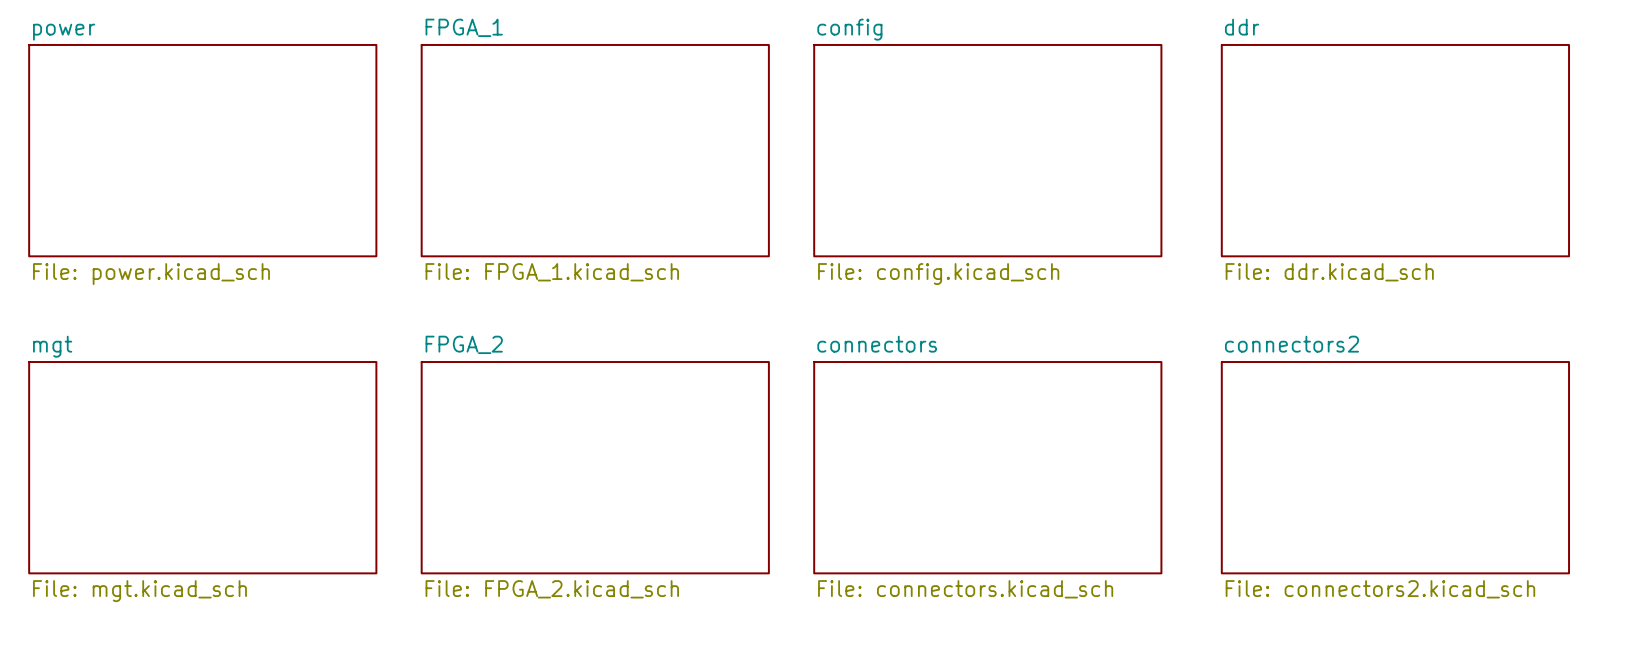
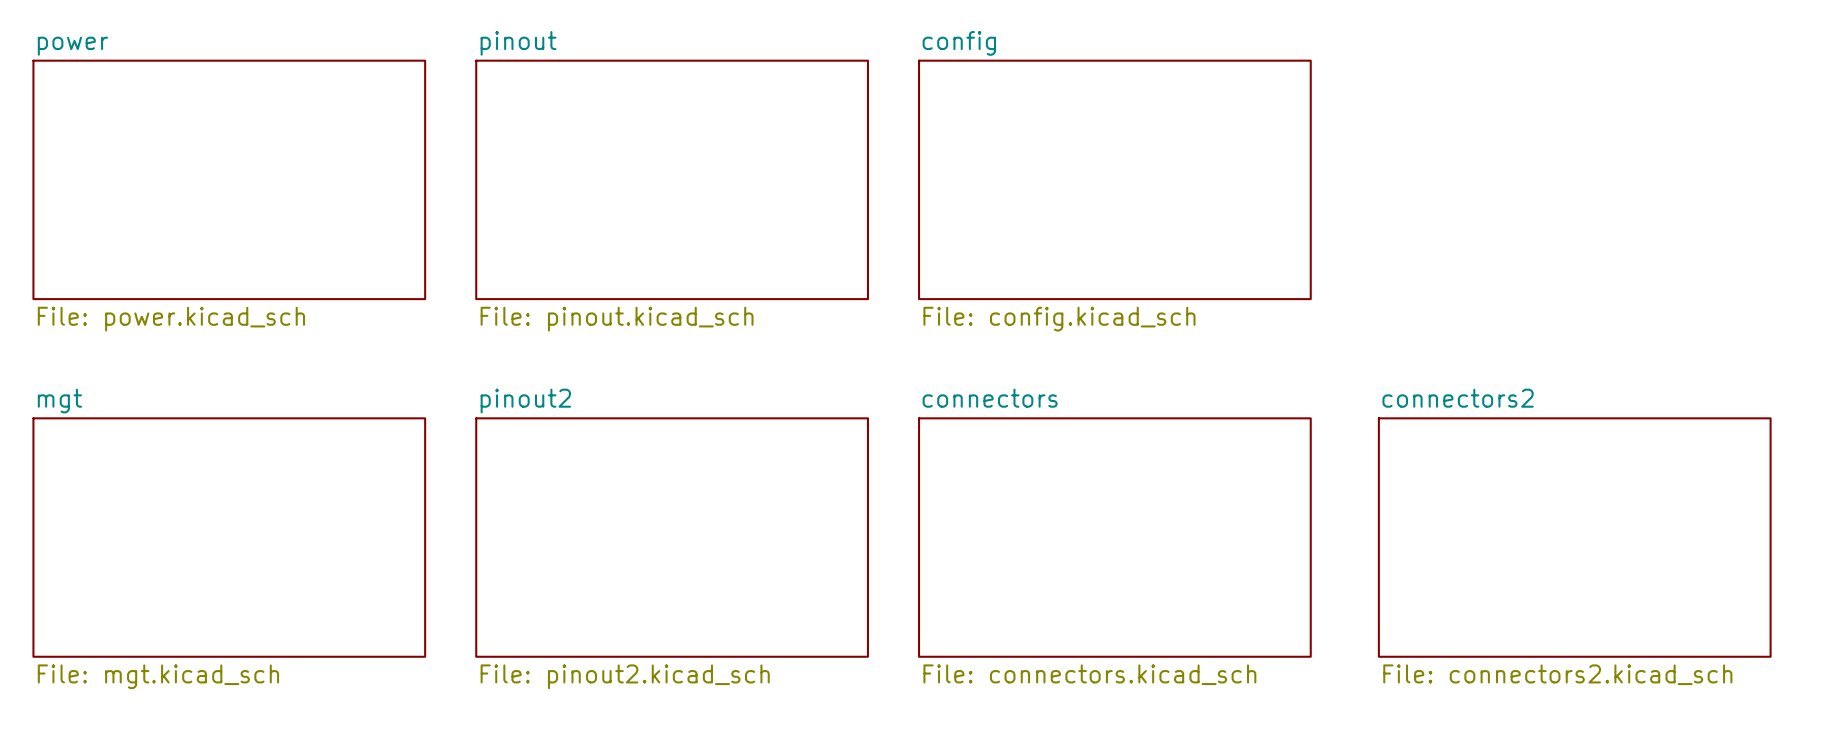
sheet FPGA_1 name: FPGA_1 (464, 27) -> pinout (518, 43)
sheet ddr: File: ddr.kicad_sch (1395, 150) -> none
sheet FPGA_1 value: File: FPGA_1.kicad_sch (552, 272) -> File: pinout.kicad_sch (617, 319)
sheet FPGA_2 name: FPGA_2 (464, 344) -> pinout2 (525, 401)
sheet FPGA_2 value: File: FPGA_2.kicad_sch (552, 589) -> File: pinout2.kicad_sch (625, 676)

